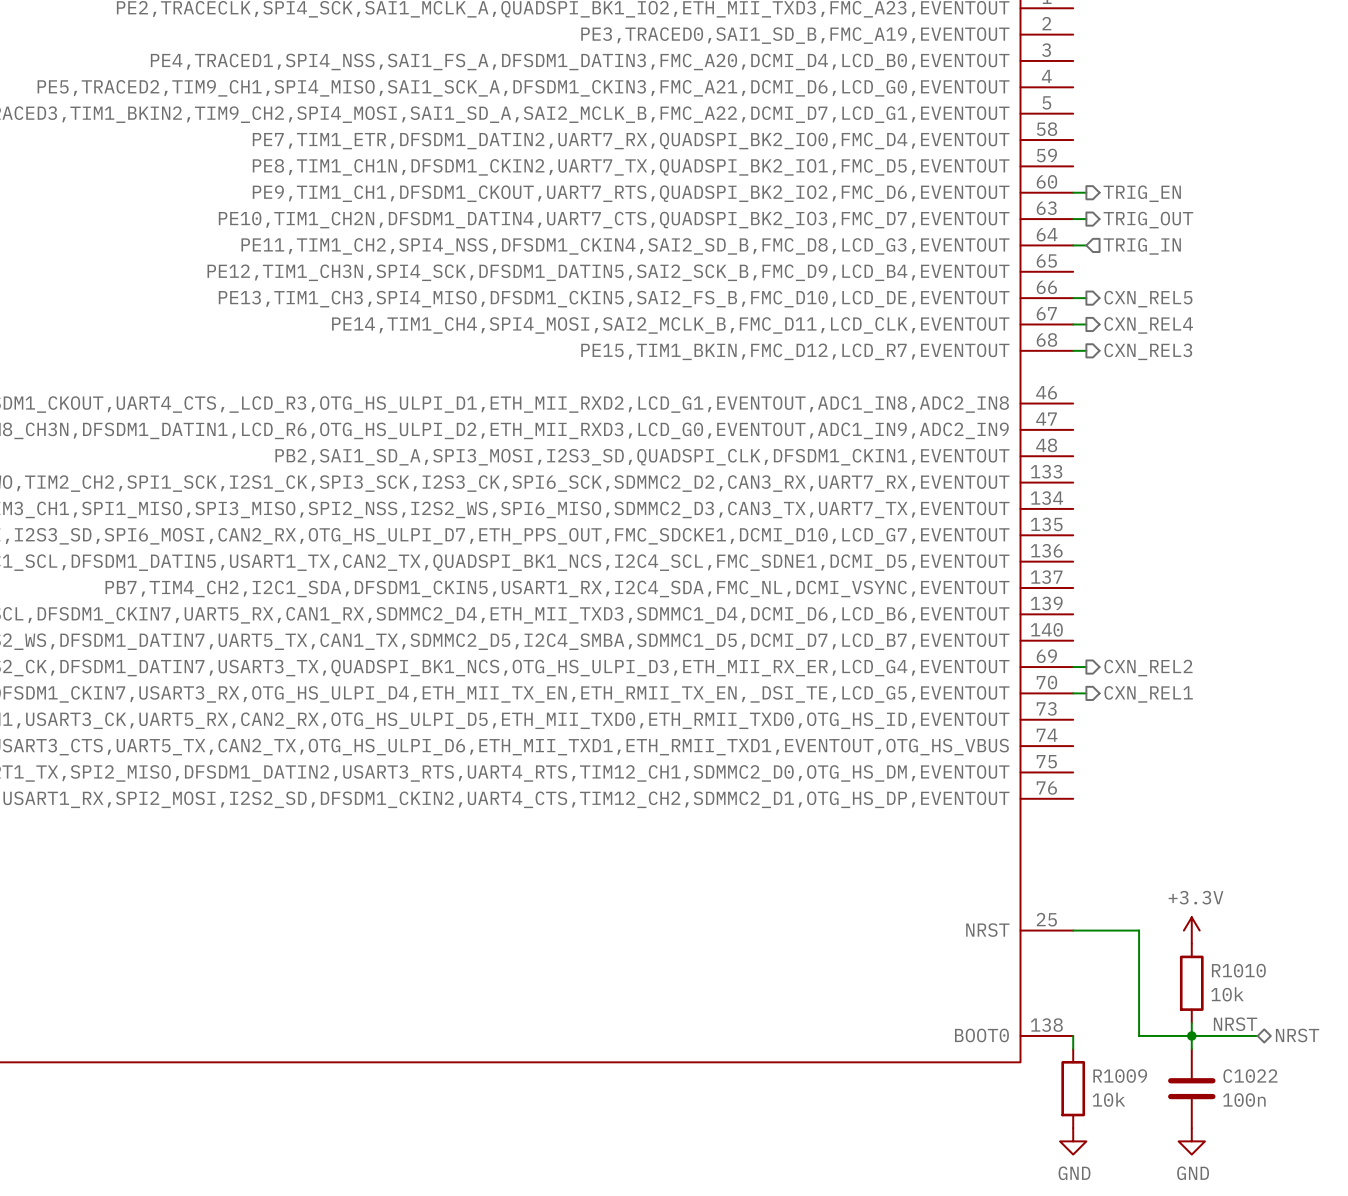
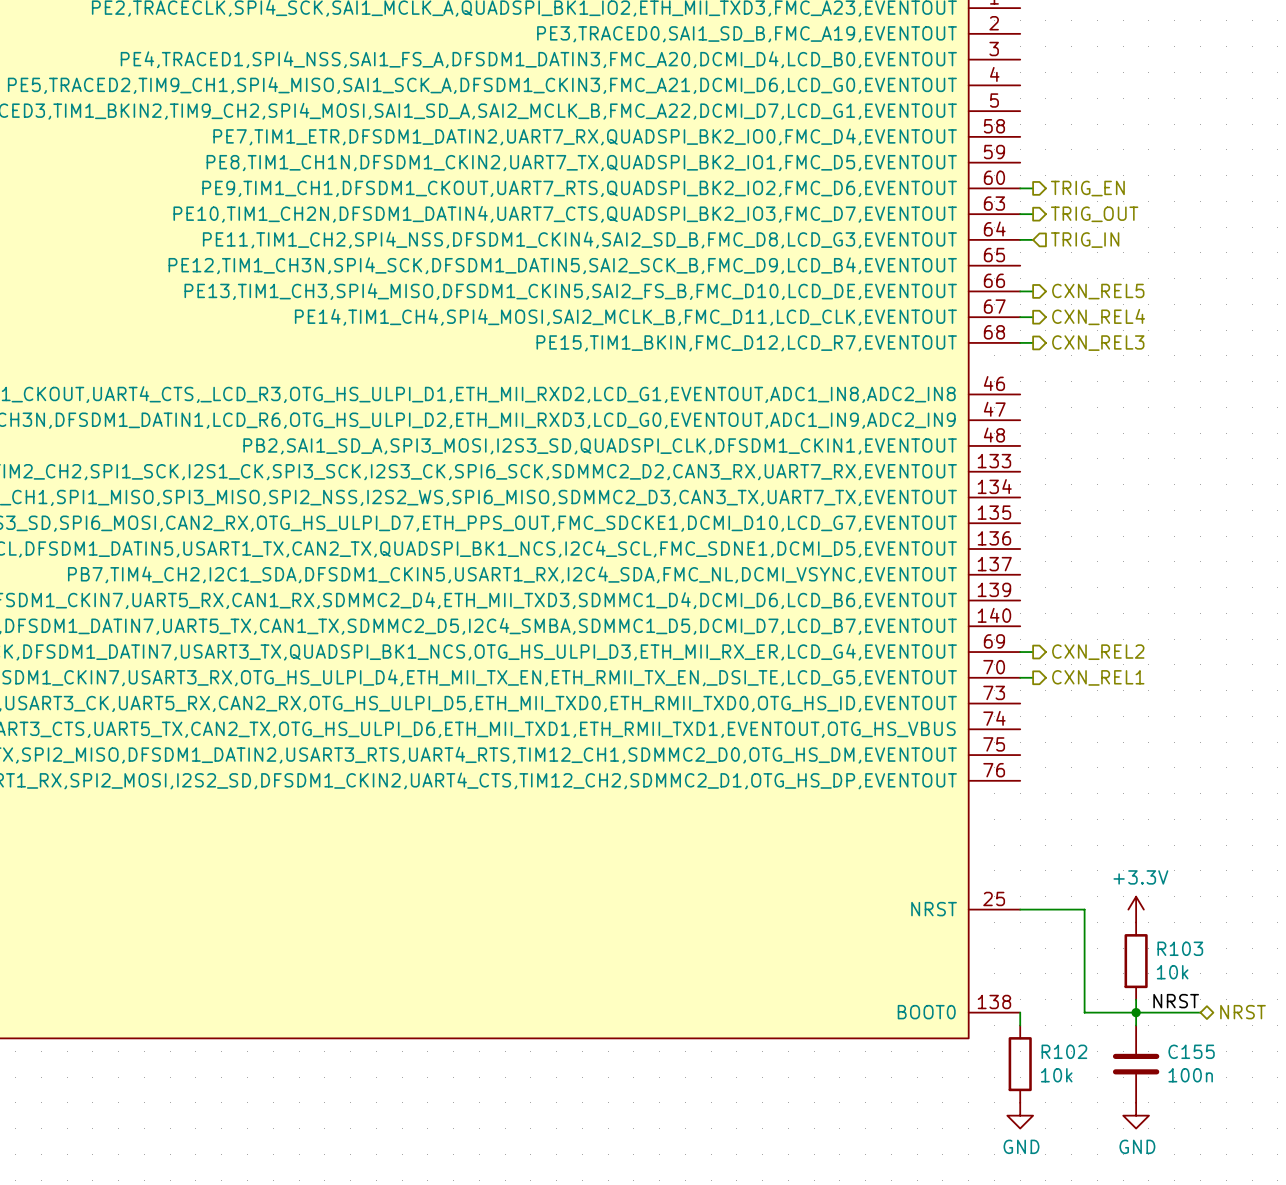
R1010 name: R1010 (1238, 970) -> R103 (1180, 948)
R1009 name: R1009 (1120, 1076) -> R102 (1064, 1051)
C1022 name: C1022 (1250, 1076) -> C155 (1191, 1051)

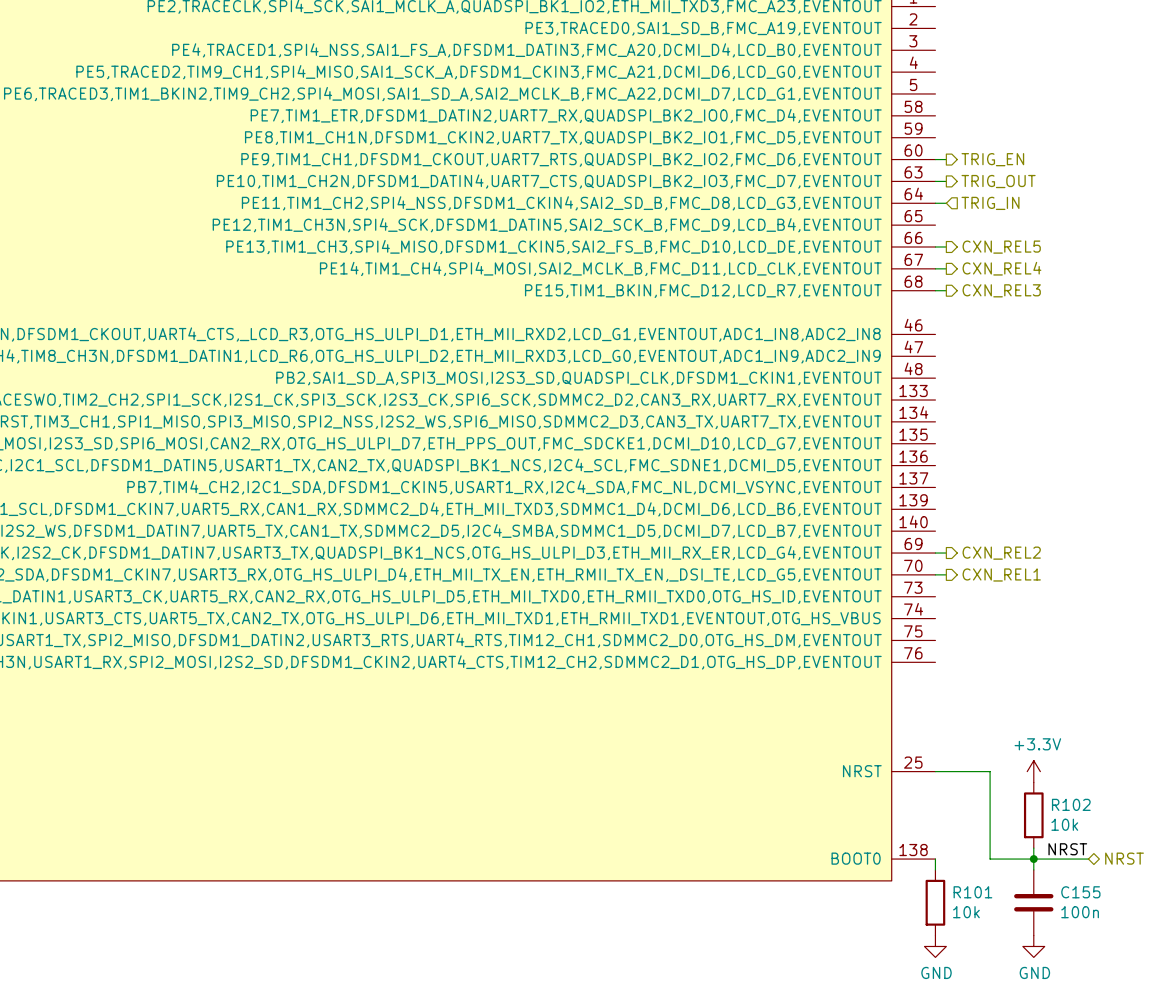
R103 name: R103 (1180, 948) -> R102 (1071, 804)
R102 name: R102 (1064, 1051) -> R101 (972, 892)

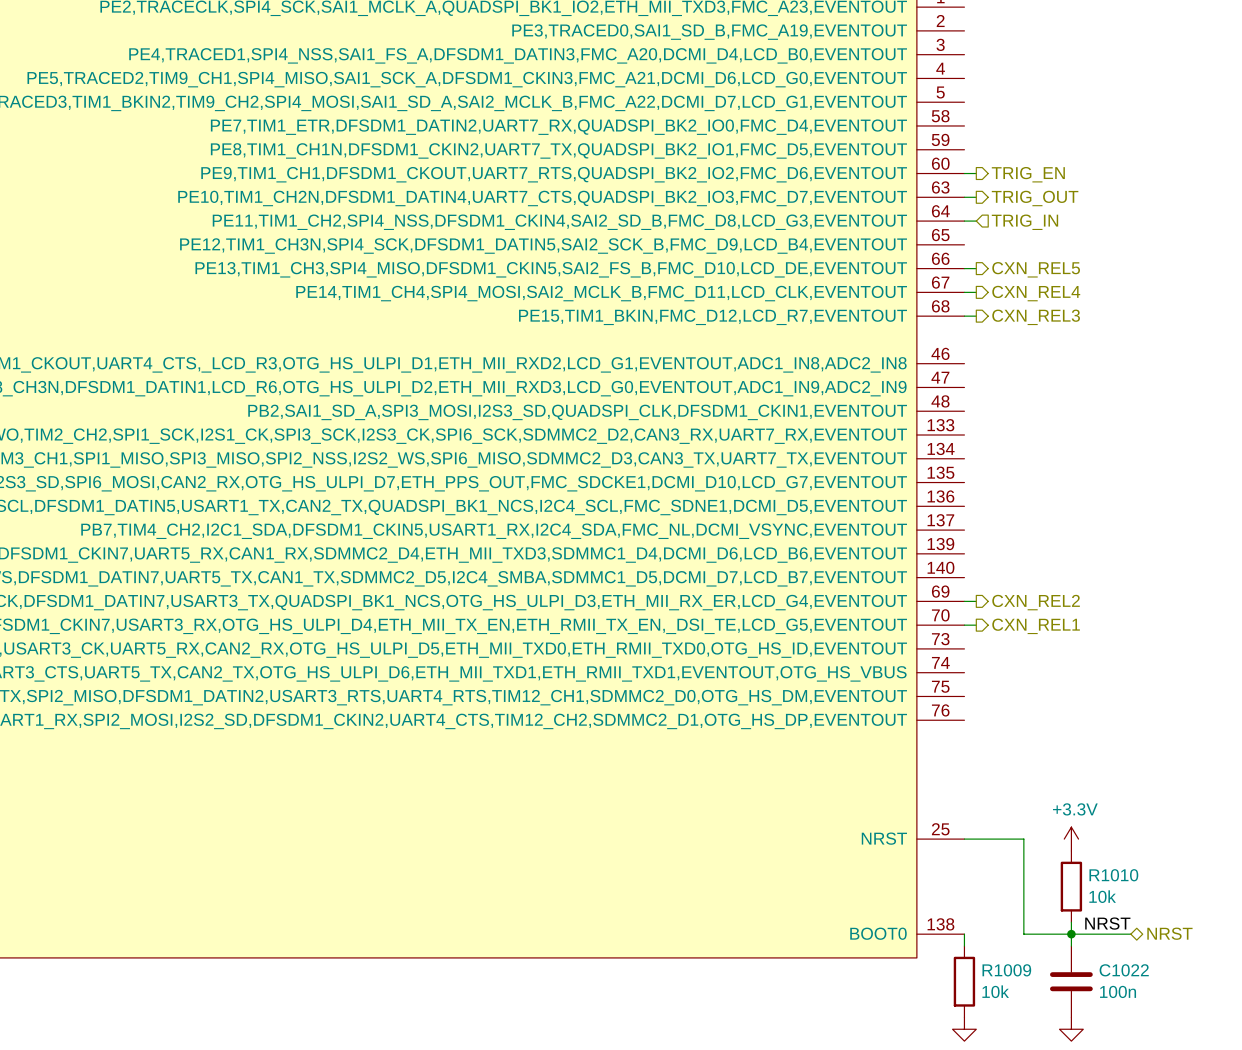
R102 name: R102 (1071, 804) -> R1010 (1113, 875)
R101 name: R101 (972, 892) -> R1009 (1006, 970)
C155 name: C155 (1080, 892) -> C1022 (1124, 970)

